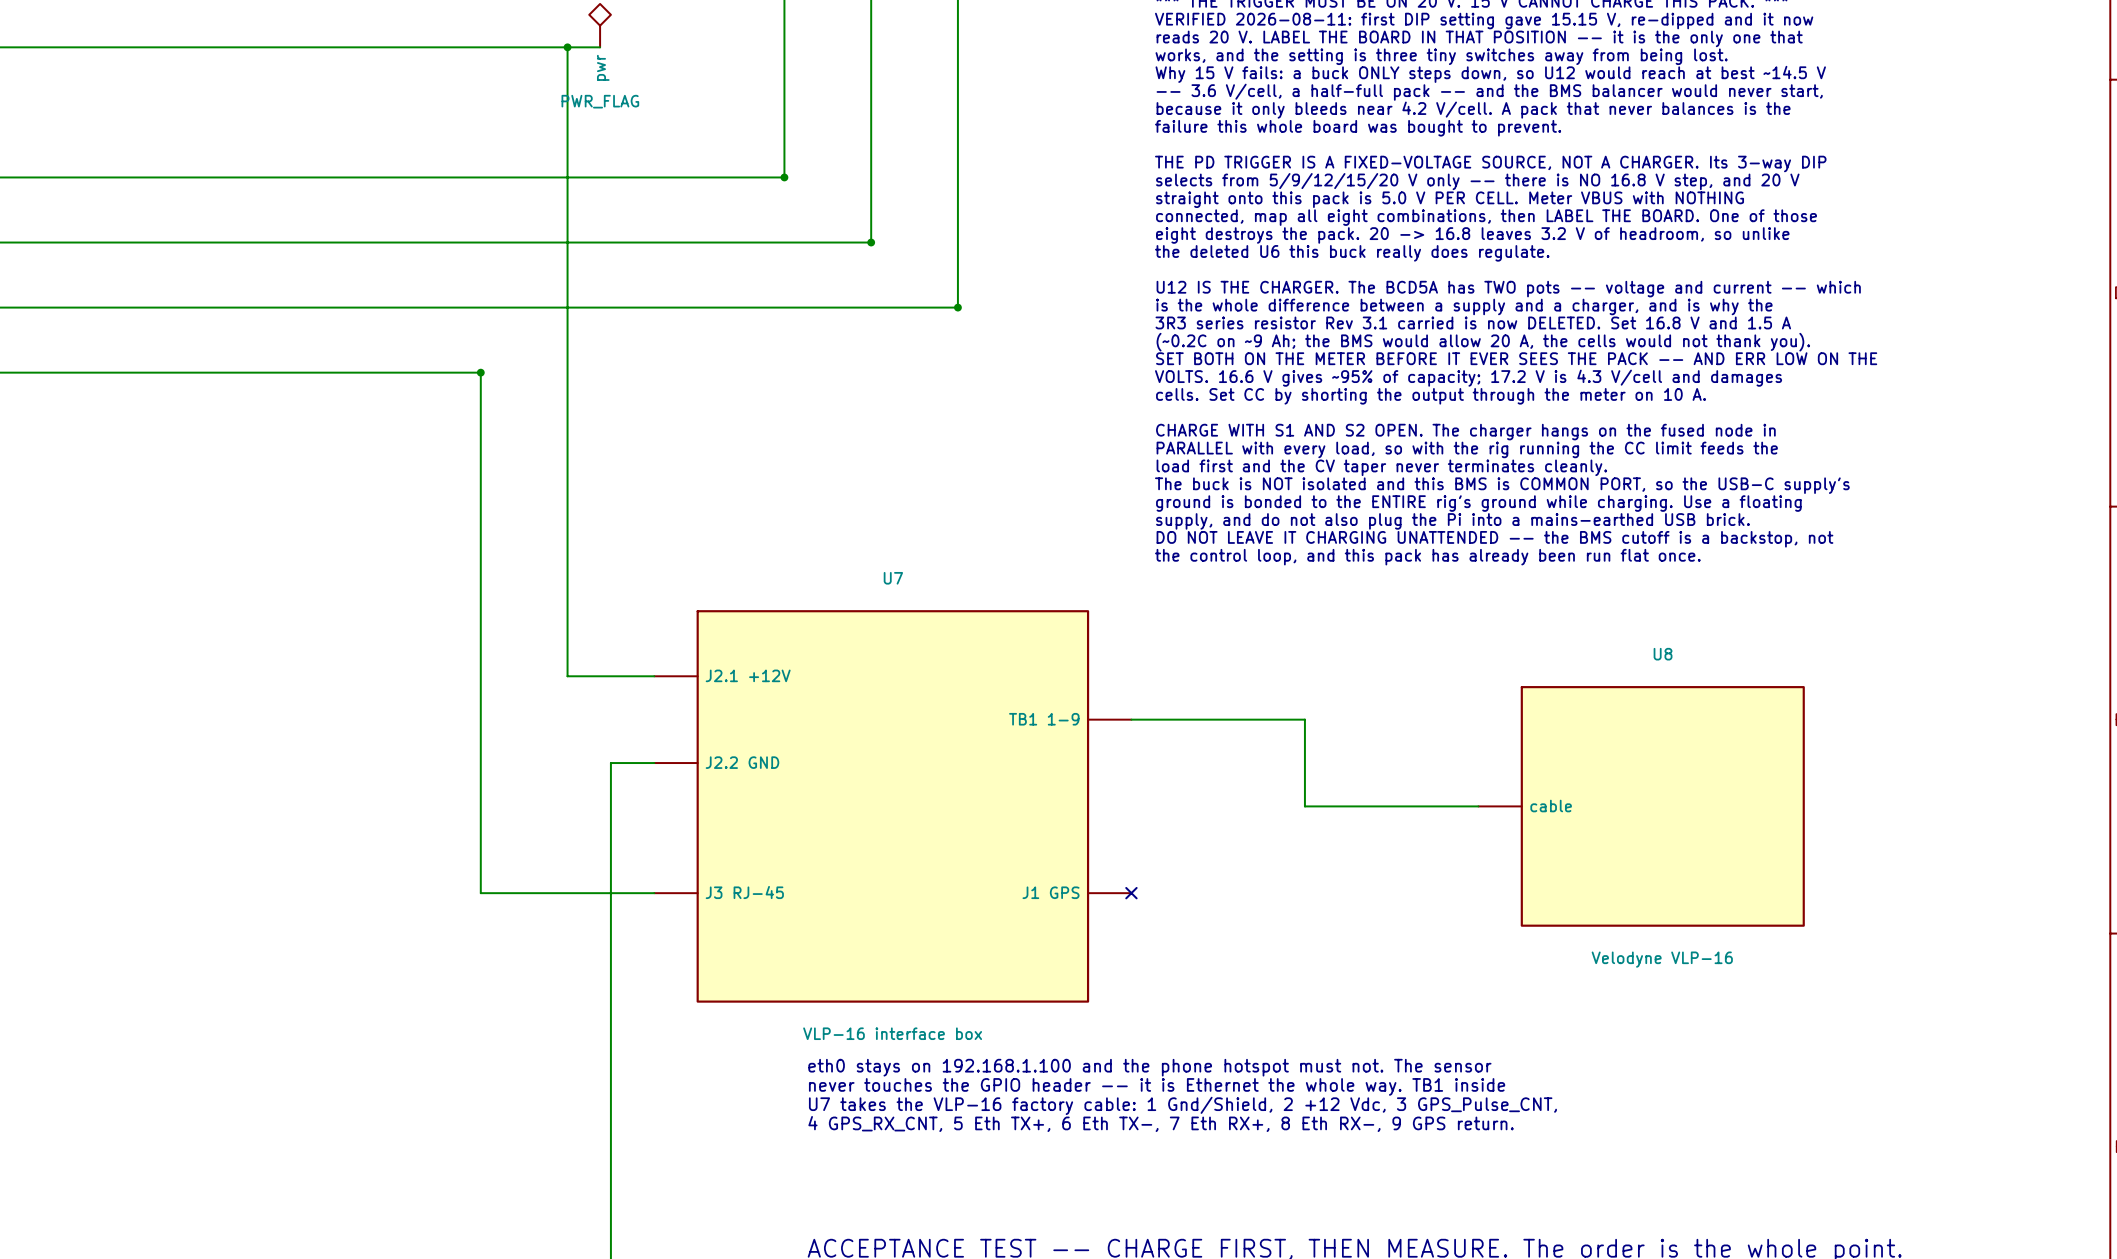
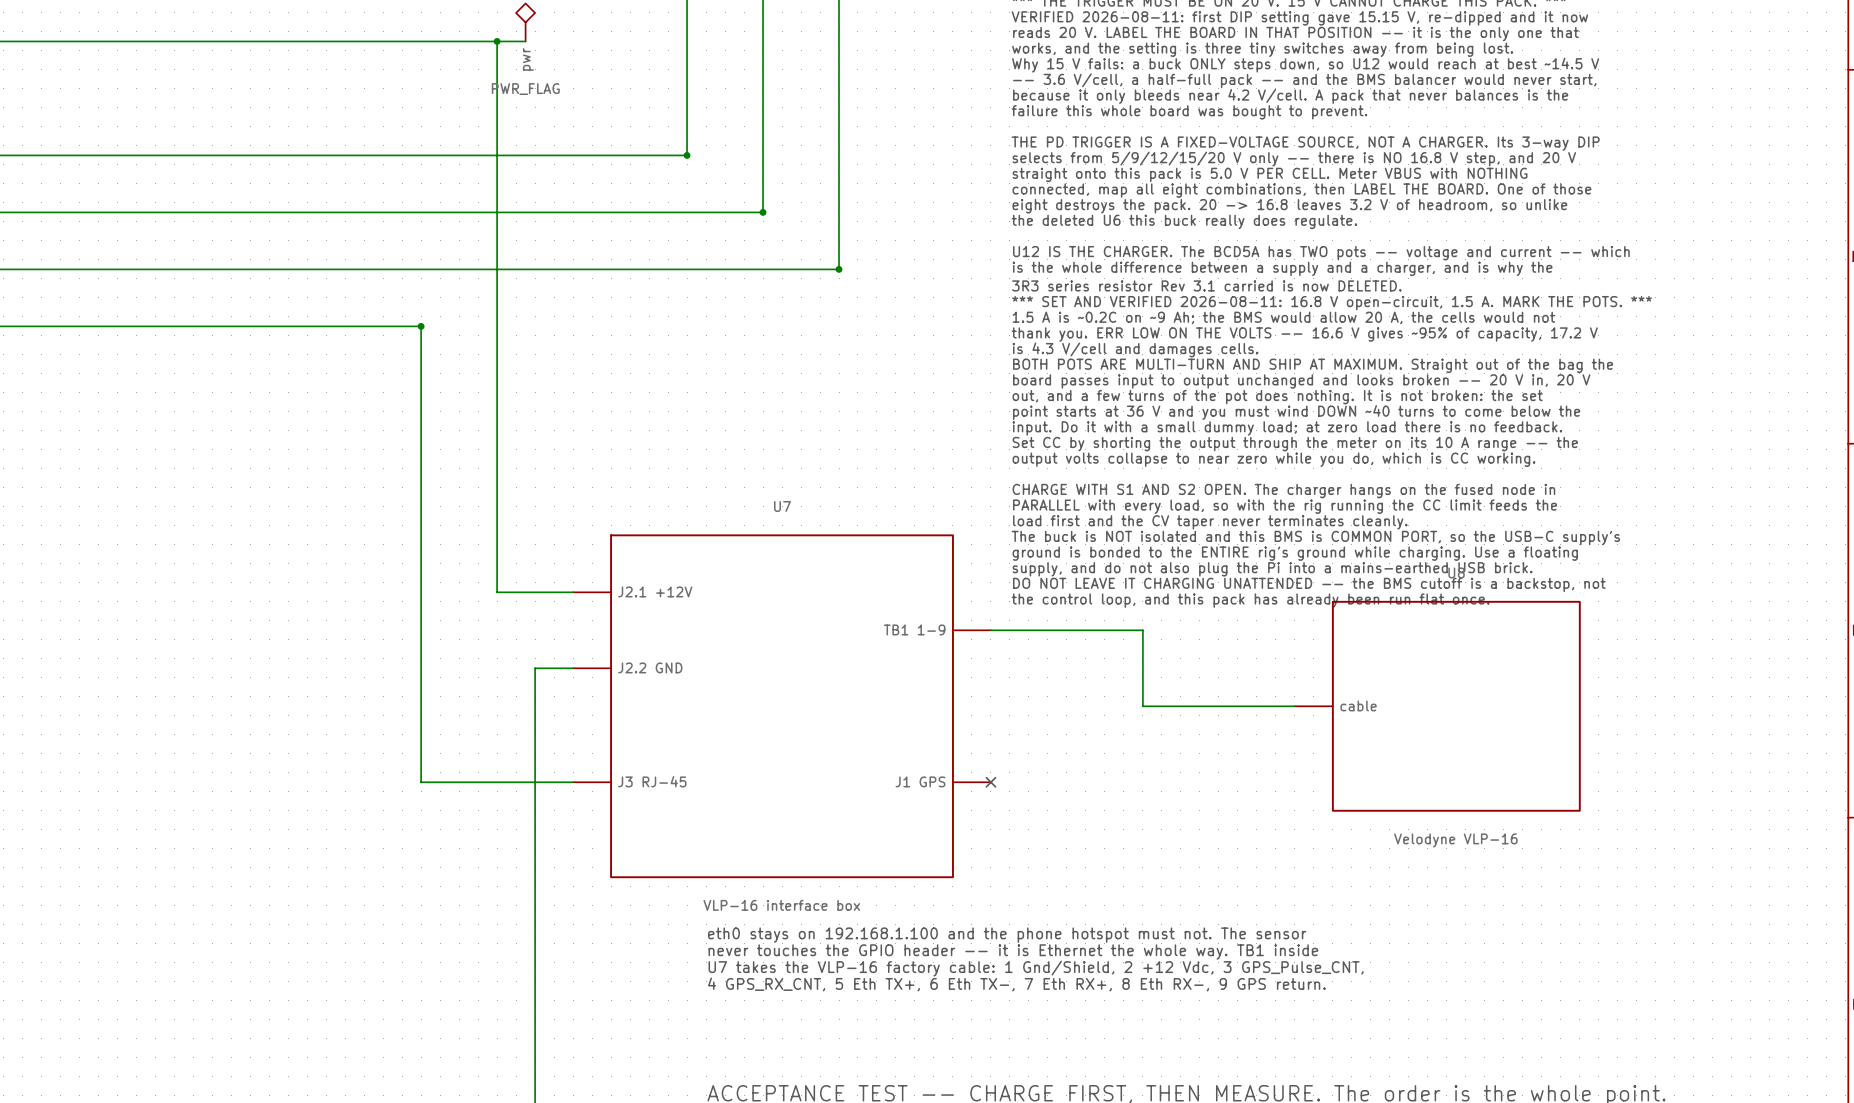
text: 3R3 series resistor Rev 3.1 carried is now DELETED. Set 16.8 V and 1.5 A (1473, 322) -> 3R3 series resistor Rev 3.1 carried is now DELETED. (1206, 285)
text: (~0.2C on ~9 Ah; the BMS would allow 20 A, the cells would not thank you). (1483, 342) -> *** SET AND VERIFIED 2026-08-11: 16.8 V open-circuit, 1.5 A. MARK THE POTS. *** (1332, 303)
text: SET BOTH ON THE METER BEFORE IT EVER SEES THE PACK -- AND ERR LOW ON THE (1516, 358) -> 1.5 A is ~0.2C on ~9 Ah; the BMS would allow 20 A, the cells would not (1283, 317)
text: VOLTS. 16.6 V gives ~95% of capacity; 17.2 V is 4.3 V/cell and damages (1468, 378) -> thank you. ERR LOW ON THE VOLTS -- 16.6 V gives ~95% of capacity, 17.2 V (1304, 334)
text: cells. Set CC by shorting the output through the meter on 10 A. (1431, 396) -> is 4.3 V/cell and damages cells. (1135, 349)
text: none -> BOTH POTS ARE MULTI-TURN AND SHIP AT MAXIMUM. Straight out of the bag the (1313, 365)
text position: CHARGE WITH S1 AND S2 OPEN. The charger hangs on the fused node in (1465, 432) -> CHARGE WITH S1 AND S2 OPEN. The charger hangs on the fused node in (1283, 491)
text: none -> board passes input to output unchanged and looks broken -- 20 V in, 20 V (1301, 381)
text position: PARALLEL with every load, so with the rig running the CC limit feeds the (1467, 449) -> PARALLEL with every load, so with the rig running the CC limit feeds the (1285, 506)
text: none -> out, and a few turns of the pot does nothing. It is not broken: the set (1277, 397)
text position: load first and the CV taper never terminates cleanly. (1381, 467) -> load first and the CV taper never terminates cleanly. (1210, 522)
text: none -> point starts at 36 V and you must wind DOWN ~40 turns to come below the (1296, 412)
text position: The buck is NOT isolated and this BMS is COMMON PORT, so the USB-C supply's (1502, 485) -> The buck is NOT isolated and this BMS is COMMON PORT, so the USB-C supply's (1315, 537)
text: none -> input. Do it with a small dummy load; at zero load there is no feedback. (1287, 428)
text position: ground is bonded to the ENTIRE rig's ground while charging. Use a floating (1478, 503) -> ground is bonded to the ENTIRE rig's ground while charging. Use a floating (1295, 553)
text: none -> Set CC by shorting the output through the meter on its 10 A range -- the (1295, 444)
text position: supply, and do not also plug the Pi into a mains-earthed USB brick. (1452, 521) -> supply, and do not also plug the Pi into a mains-earthed USB brick. (1272, 569)
text: none -> output volts collapse to near zero while you do, which is CC working. (1273, 459)
text position: DO NOT LEAVE IT CHARGING UNATTENDED -- the BMS cutoff is a backstop, not (1494, 539) -> DO NOT LEAVE IT CHARGING UNATTENDED -- the BMS cutoff is a backstop, not (1309, 584)
text position: the control loop, and this pack has already been run flat once. (1427, 557) -> the control loop, and this pack has already been run flat once. (1250, 600)

